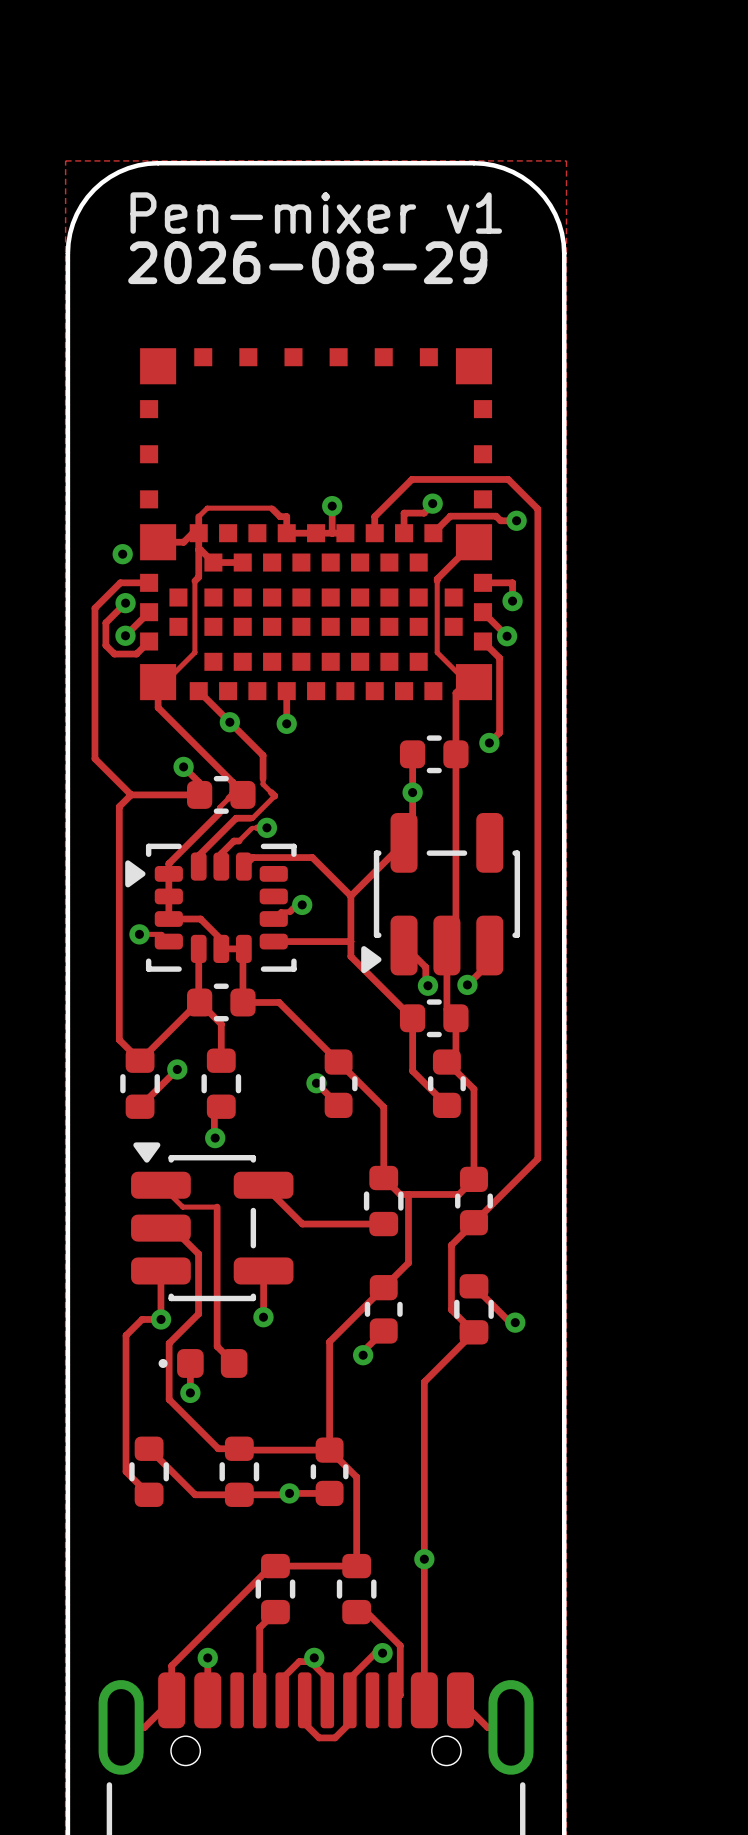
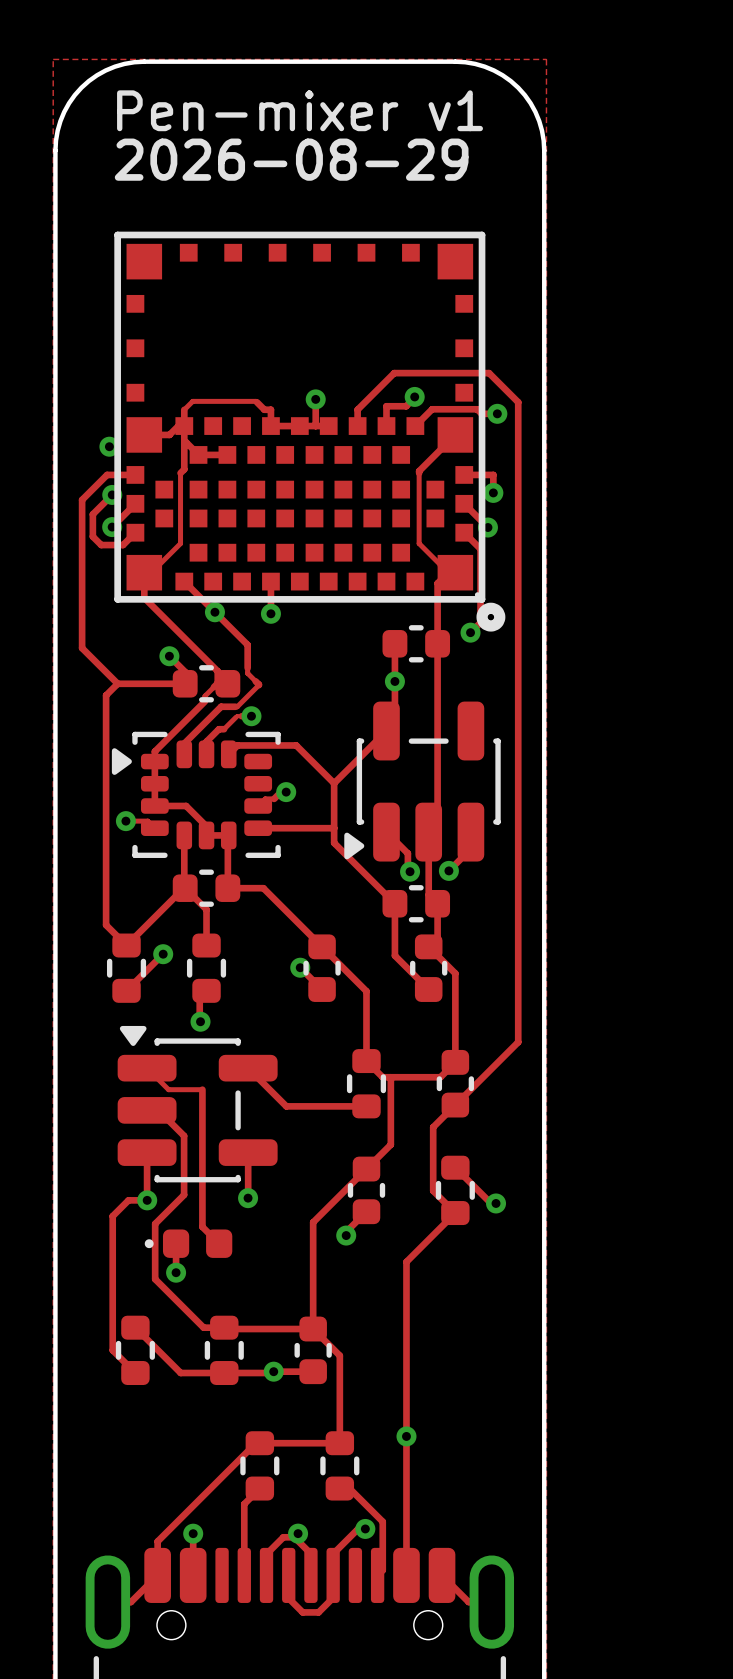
part footprint: [140, 348, 493, 701] -> [114, 231, 506, 632]

